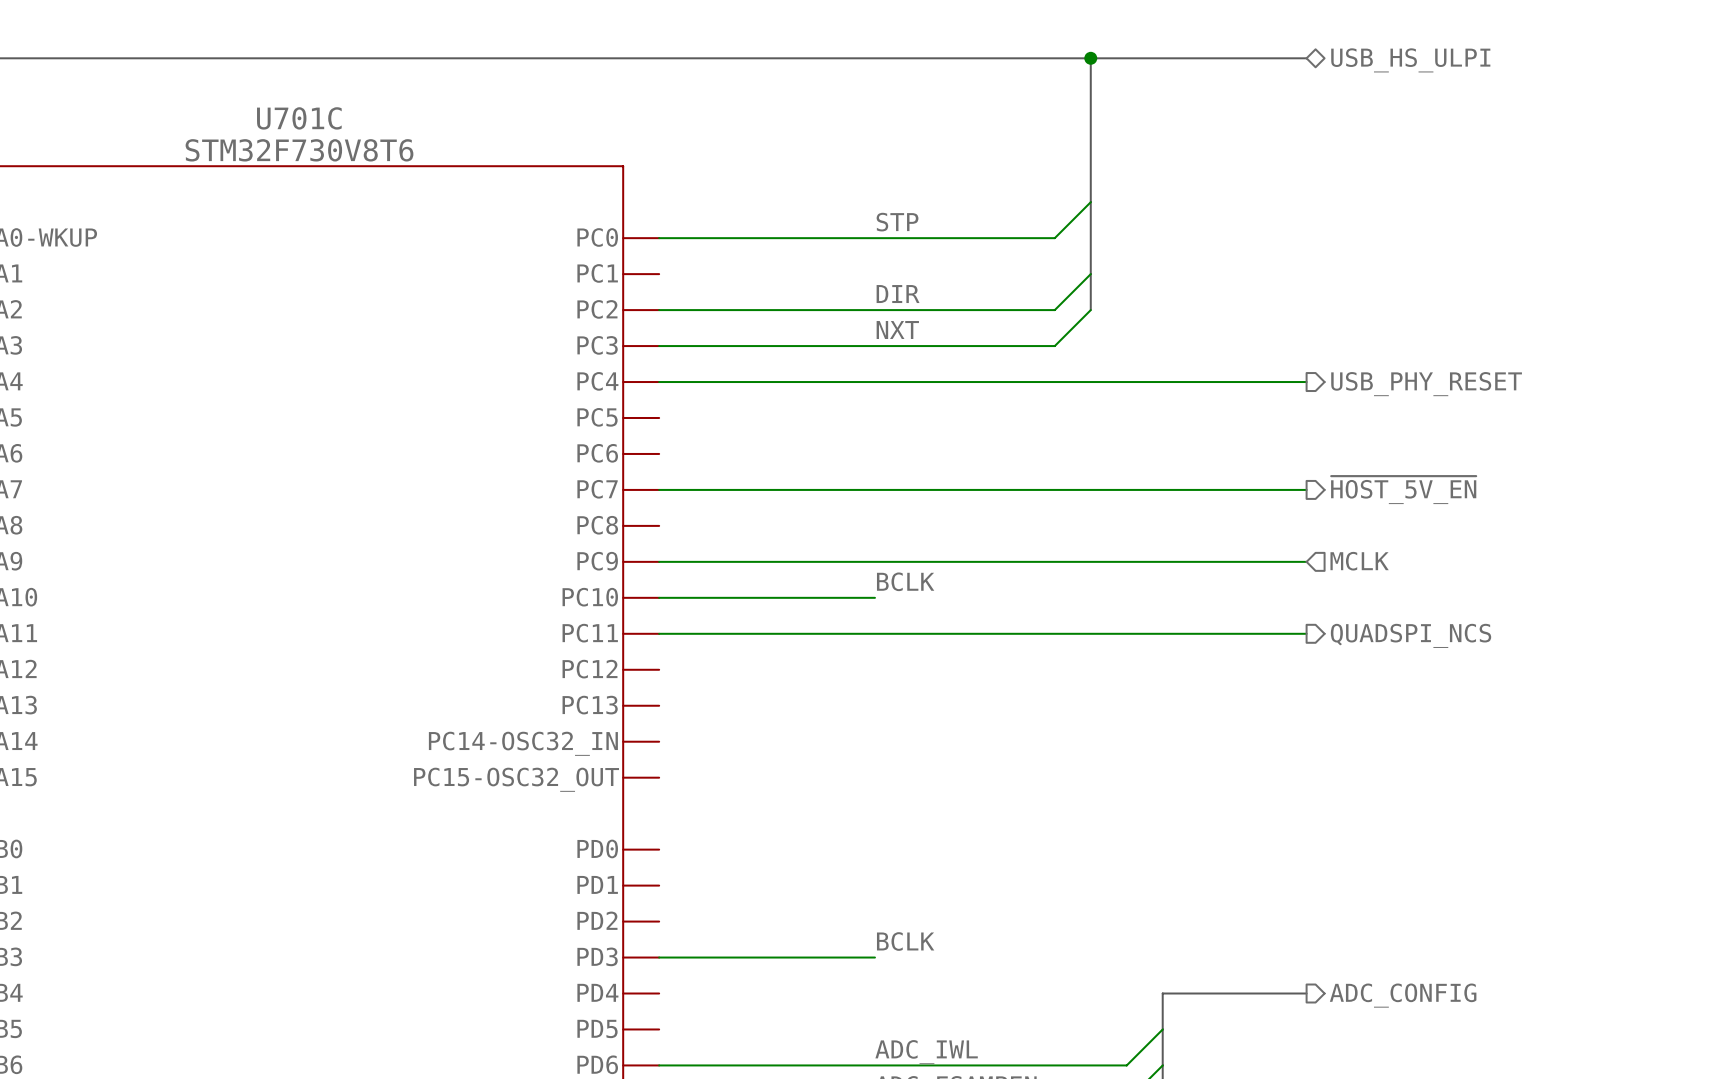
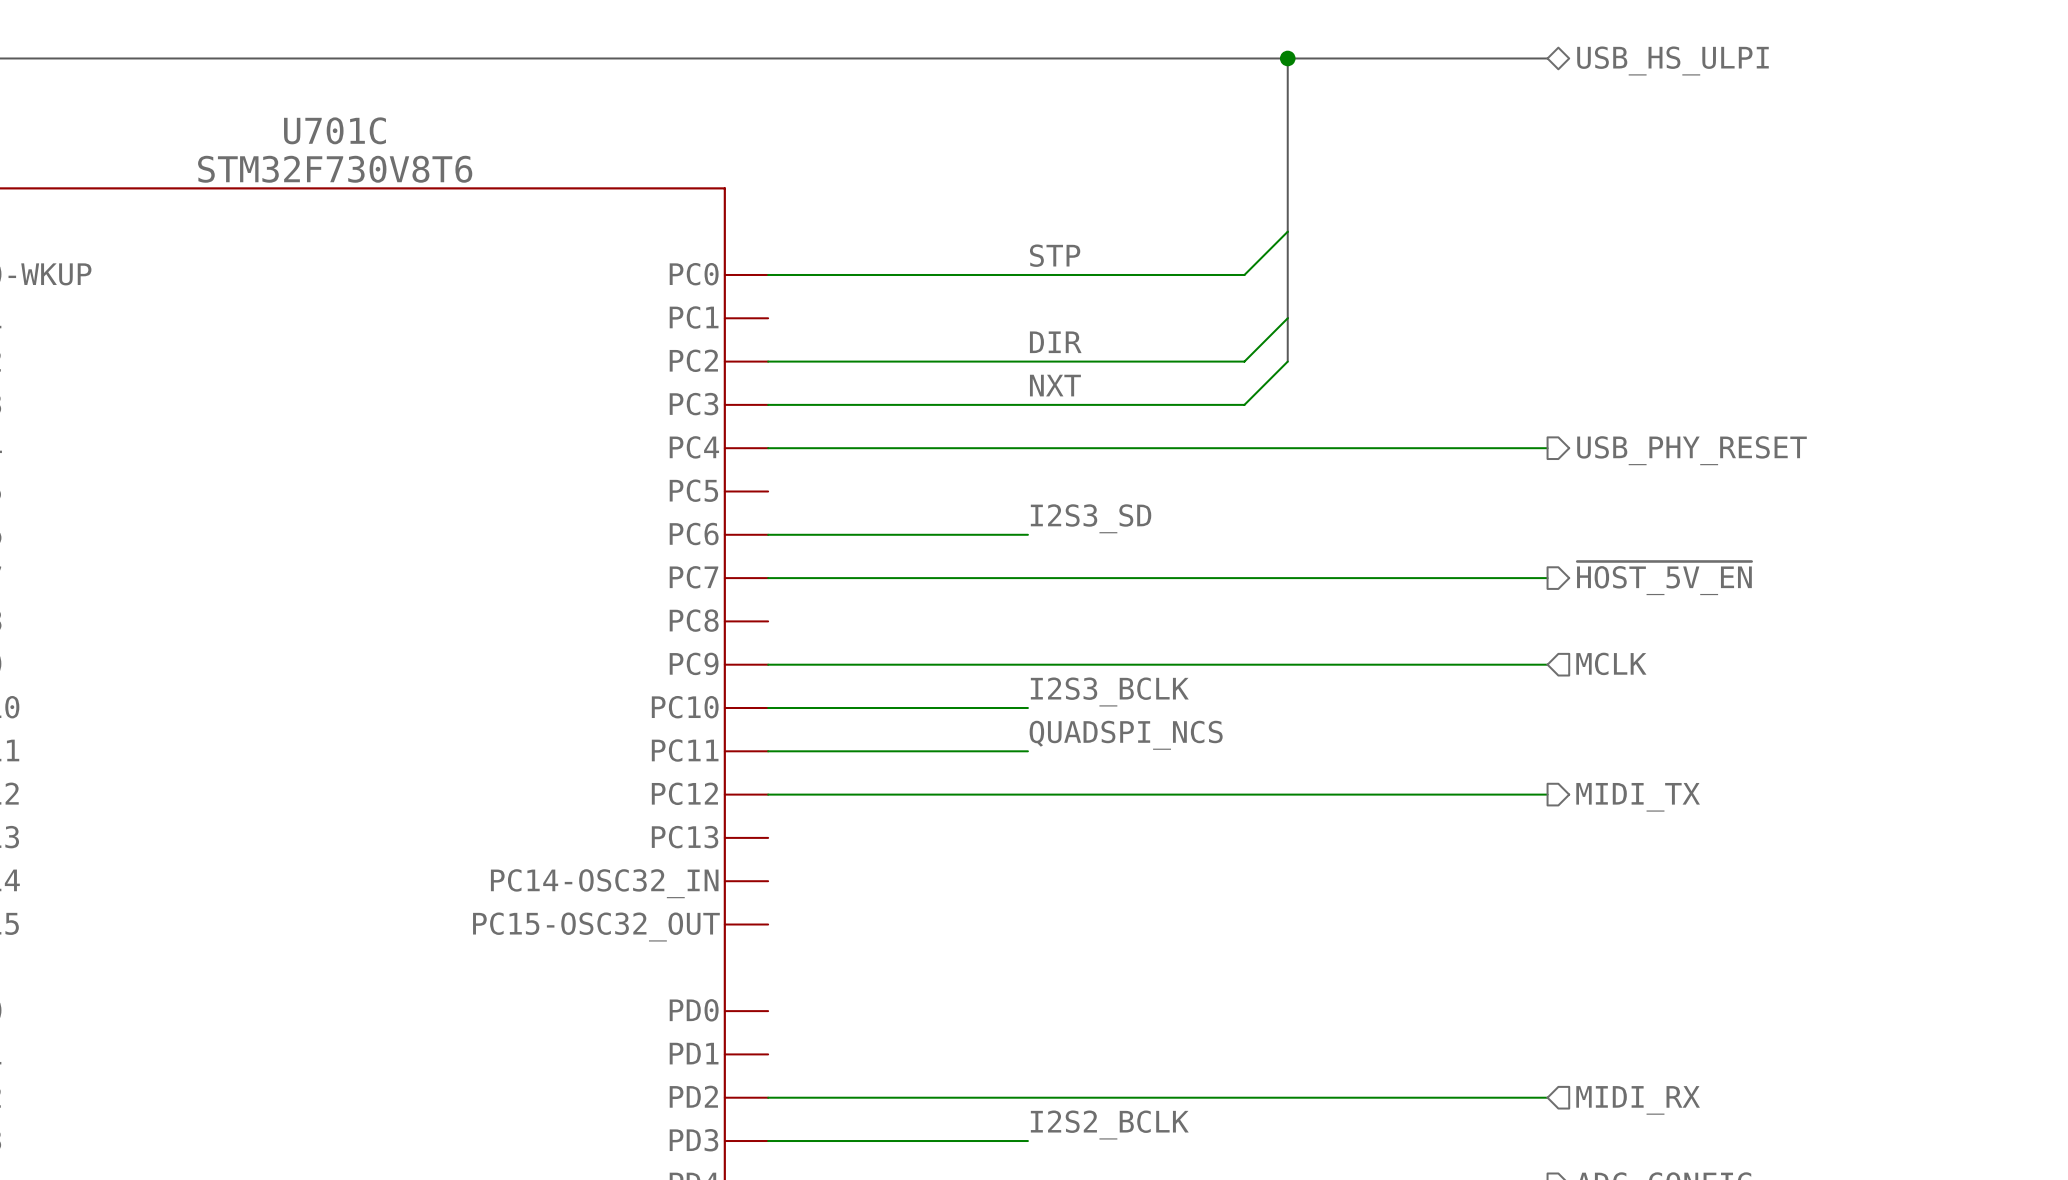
label: none -> I2S3_SD (1091, 518)
wire: none -> (768, 534) (1027, 534)
label: BCLK (905, 581) -> I2S3_BCLK (1109, 691)
label: none -> QUADSPI_NCS (1126, 735)
wire: (874, 633) (1306, 633) -> none
hierarchical label: QUADSPI_NCS (1411, 635) -> none
wire: none -> (768, 794) (1547, 794)
hierarchical label: none -> MIDI_TX (1638, 797)
wire: none -> (768, 1097) (1547, 1097)
hierarchical label: none -> MIDI_RX (1638, 1100)
label: BCLK (905, 941) -> I2S2_BCLK (1109, 1125)

